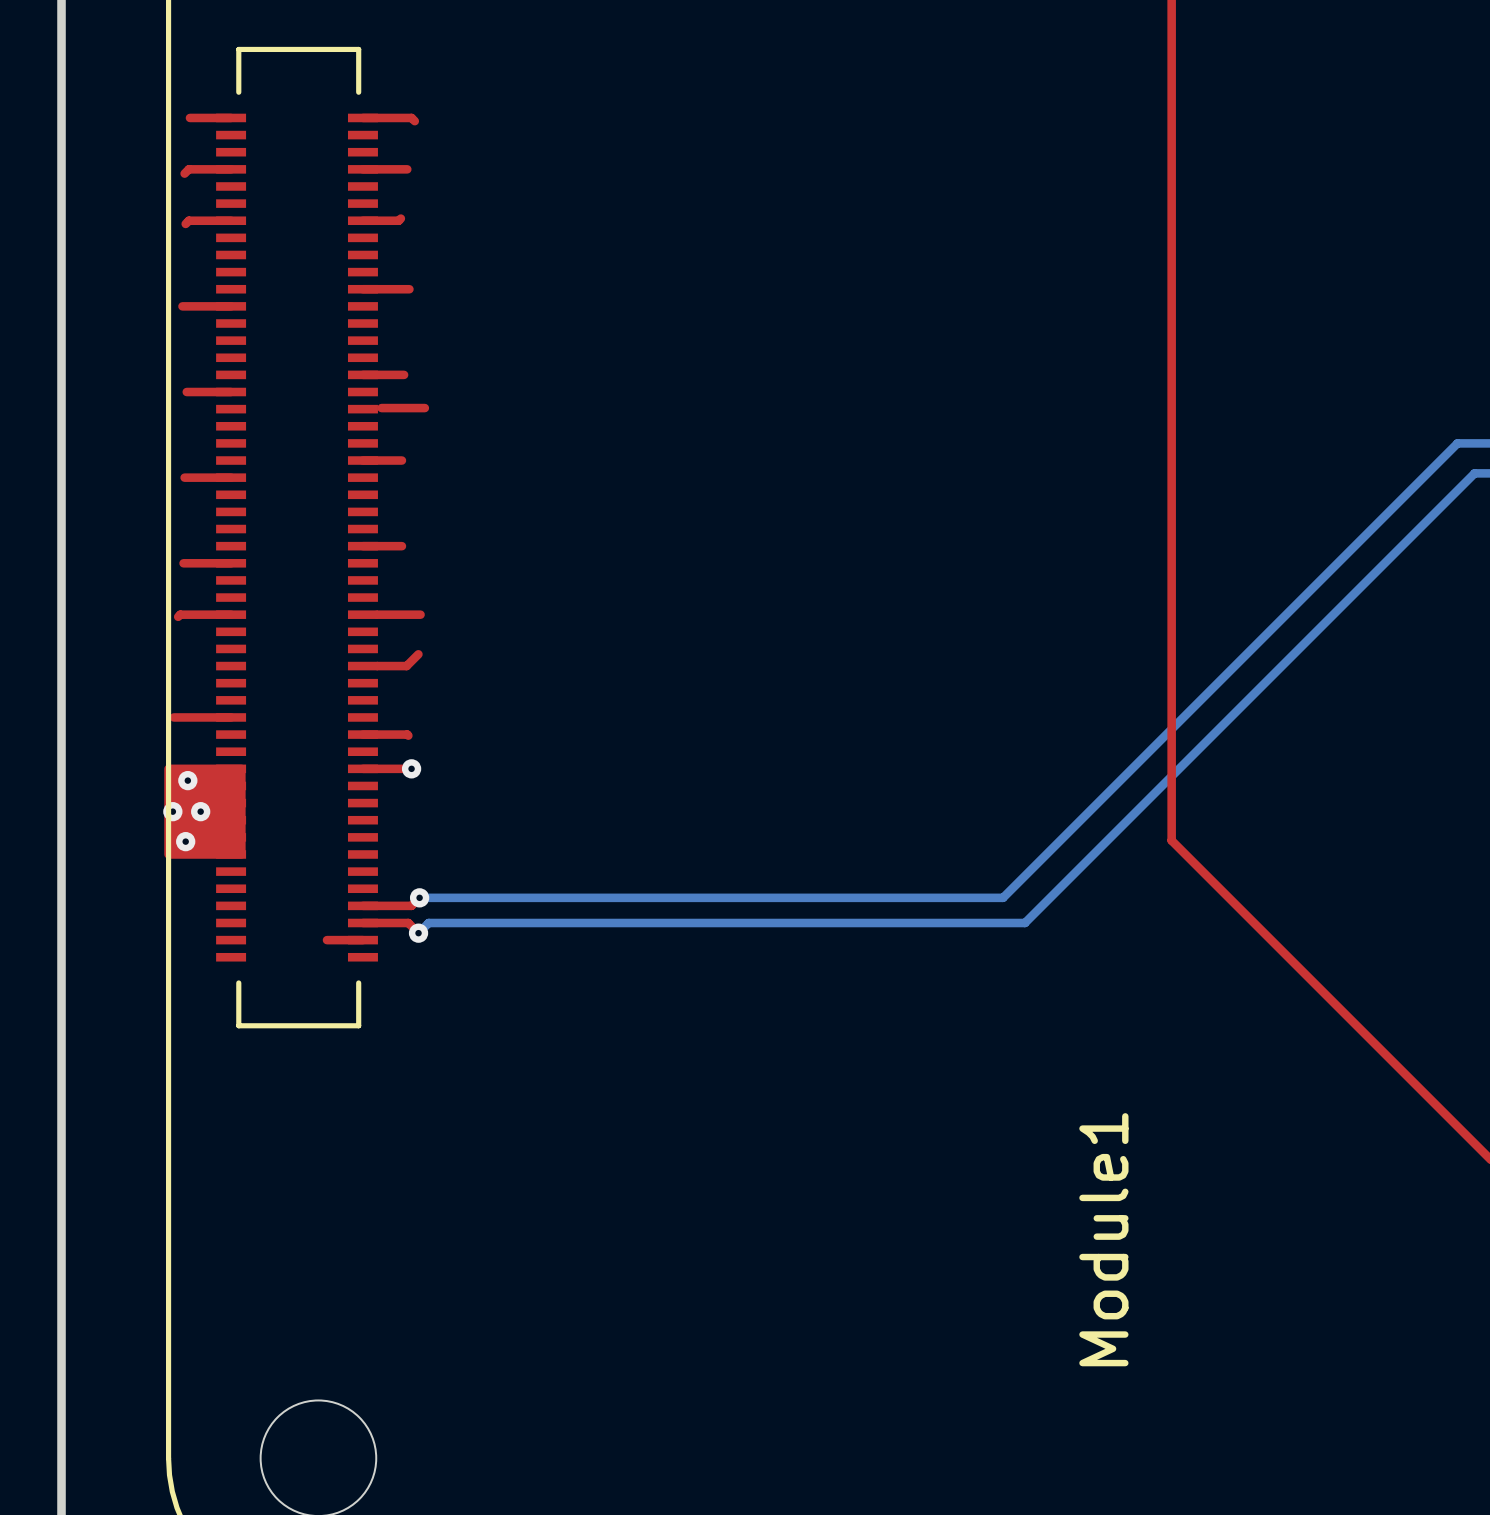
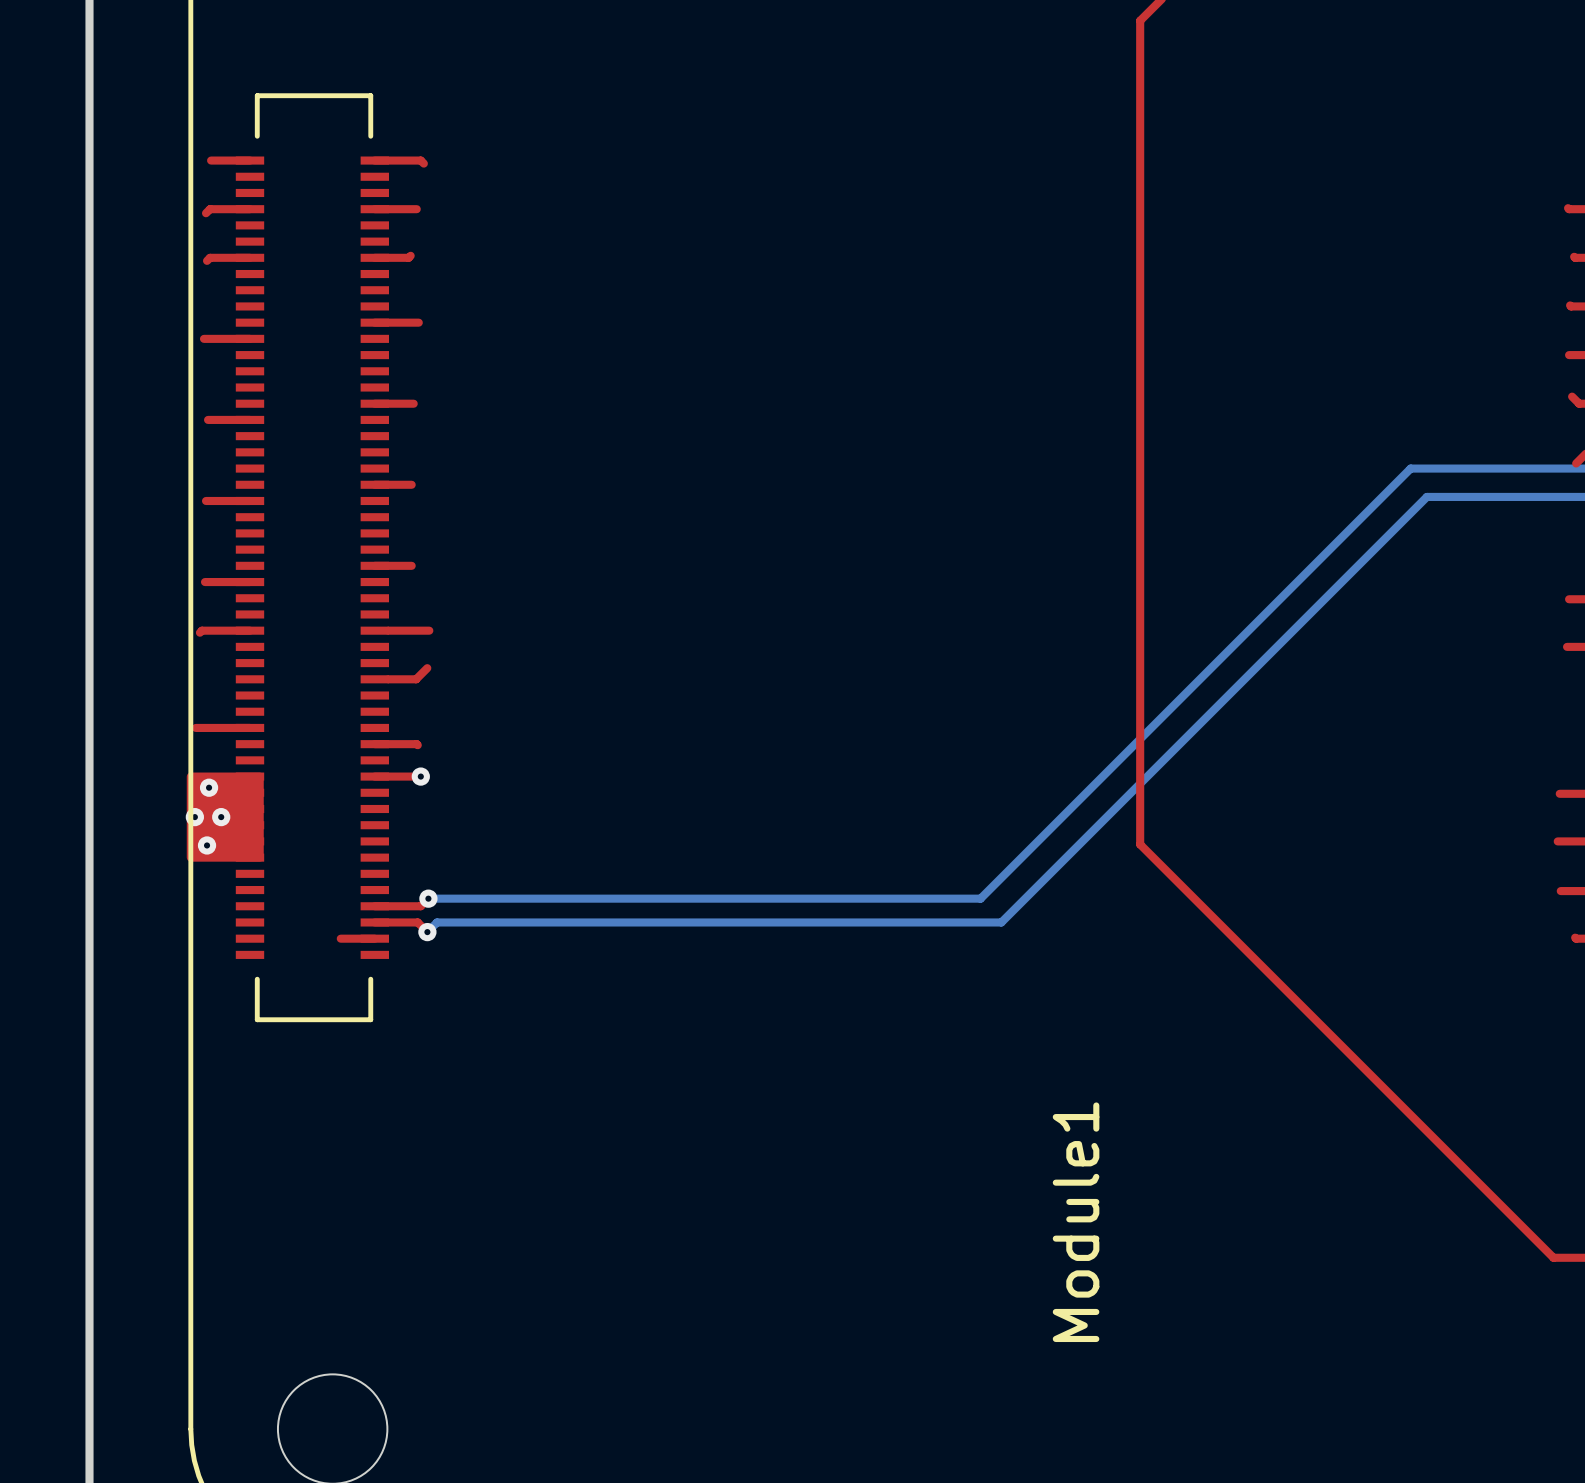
top track: (381, 408) (424, 408) -> none

